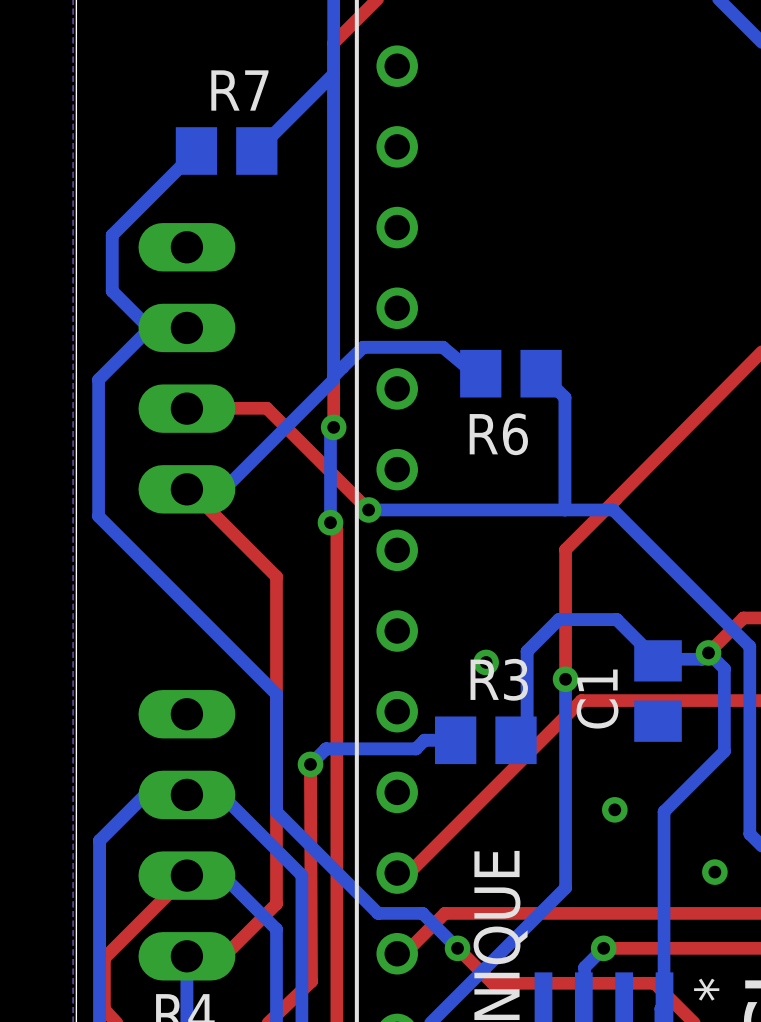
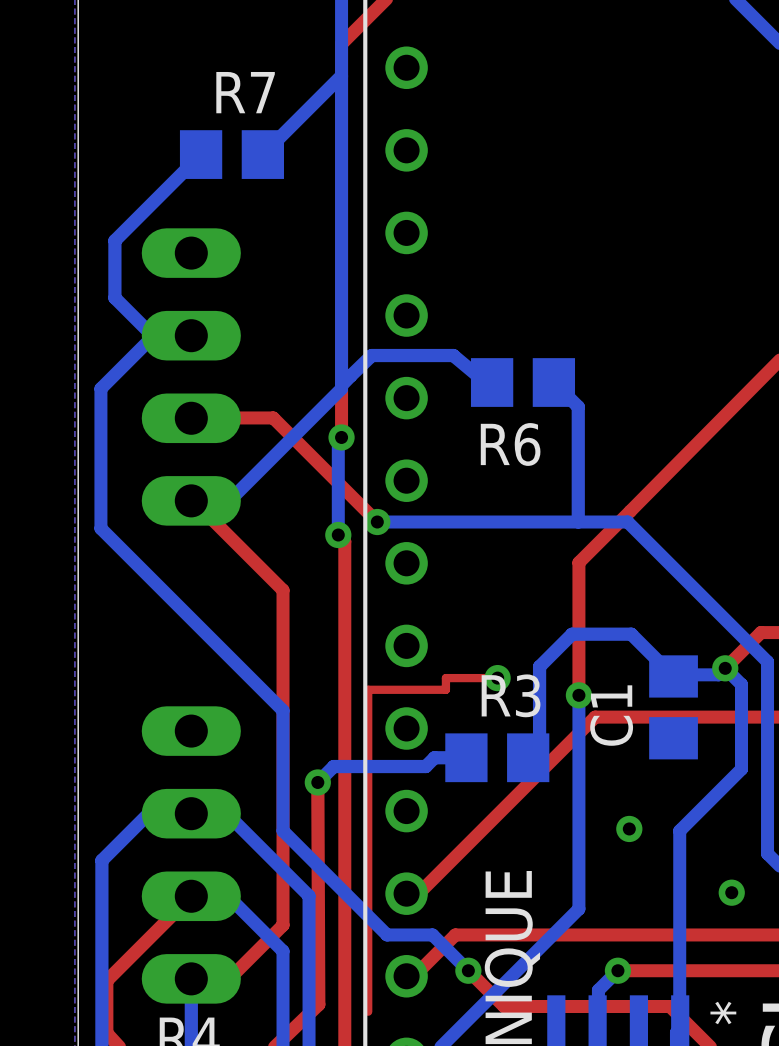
top track: none -> (497, 678) (445, 678) (445, 689) (368, 689) (368, 1011)

